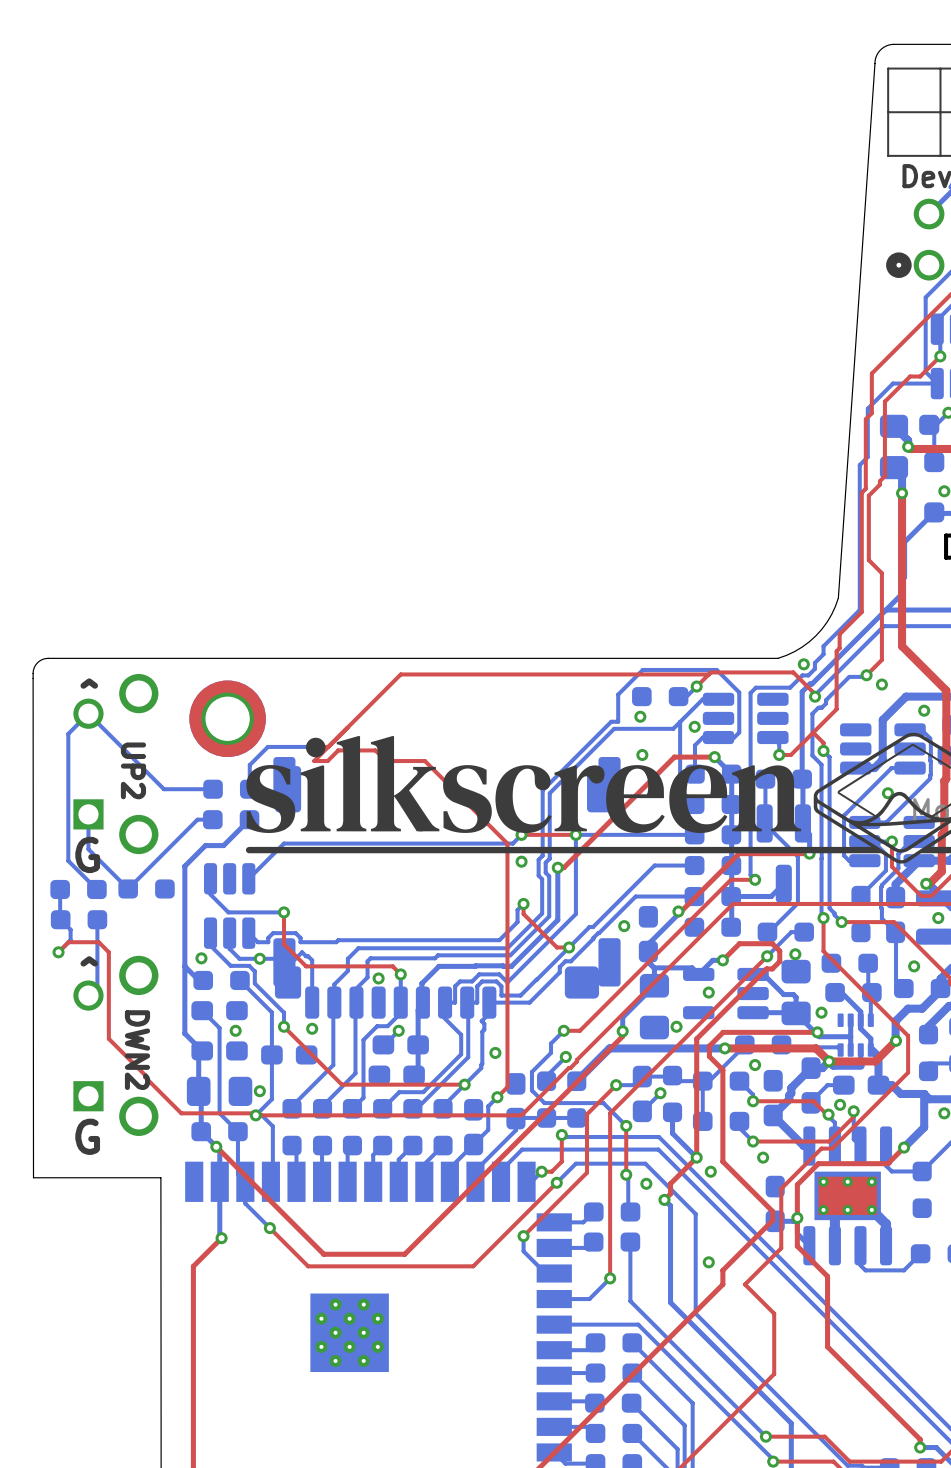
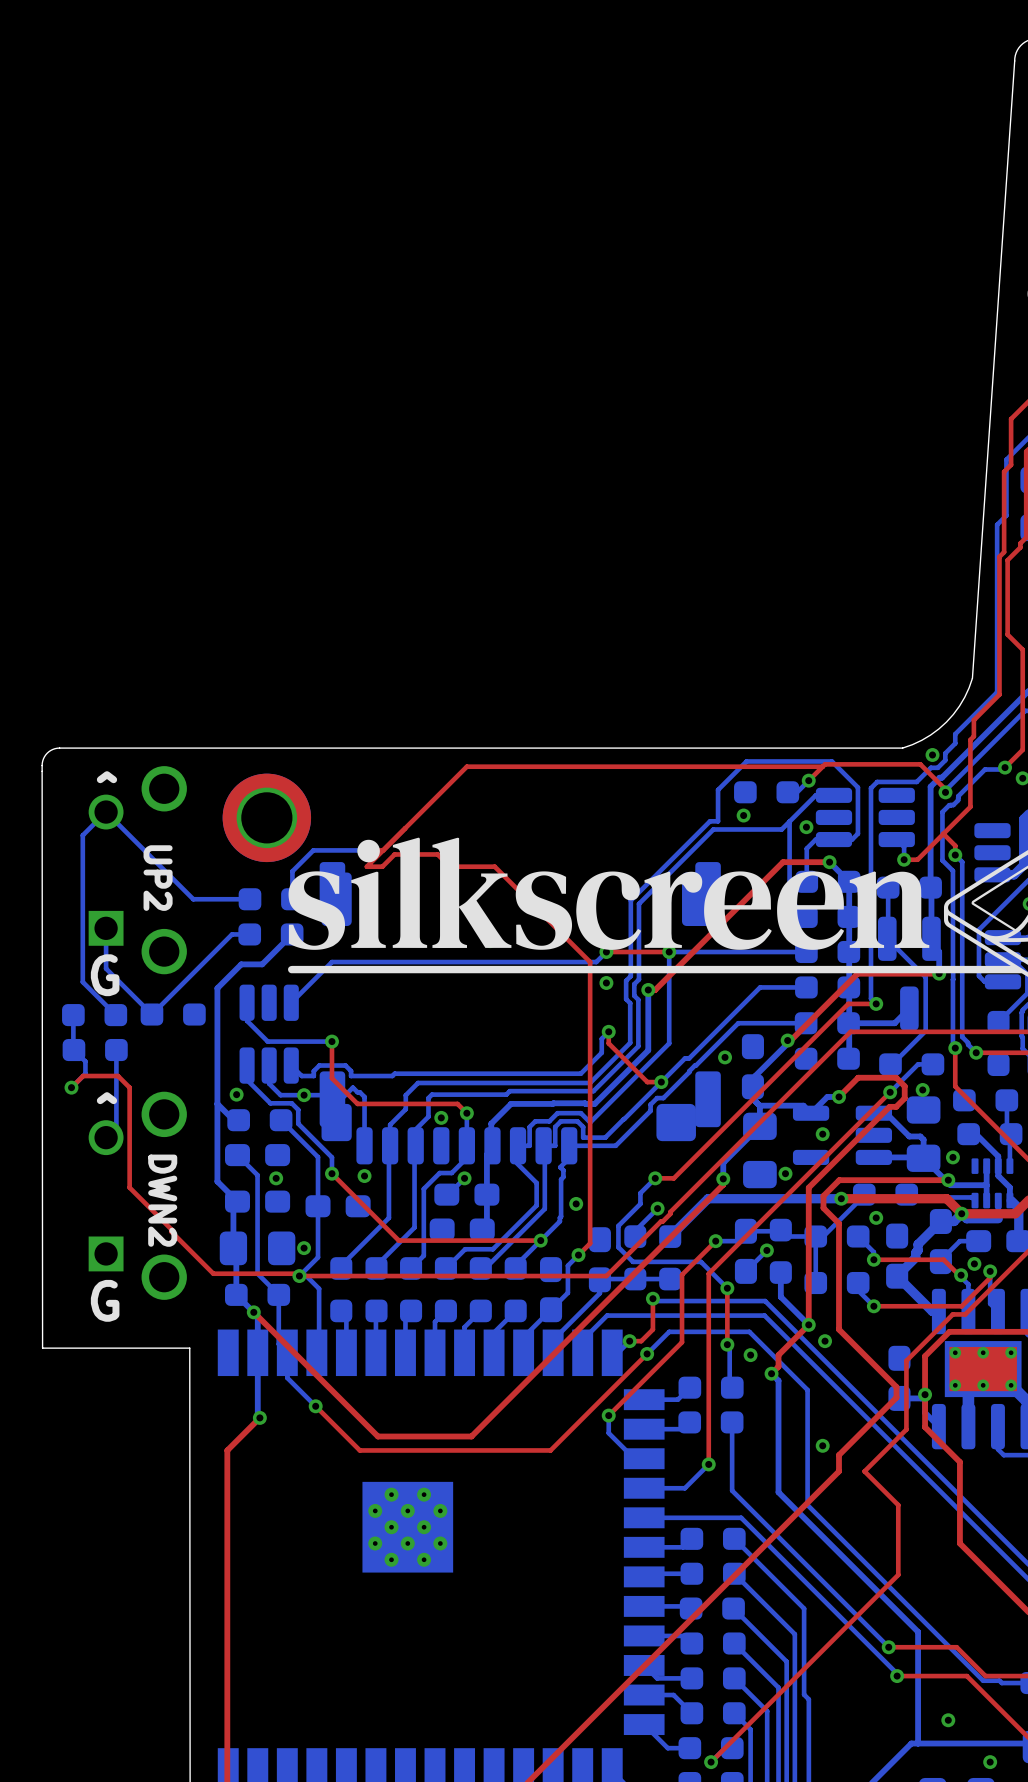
via: (642, 754) -> none
via: (763, 1157) -> none

